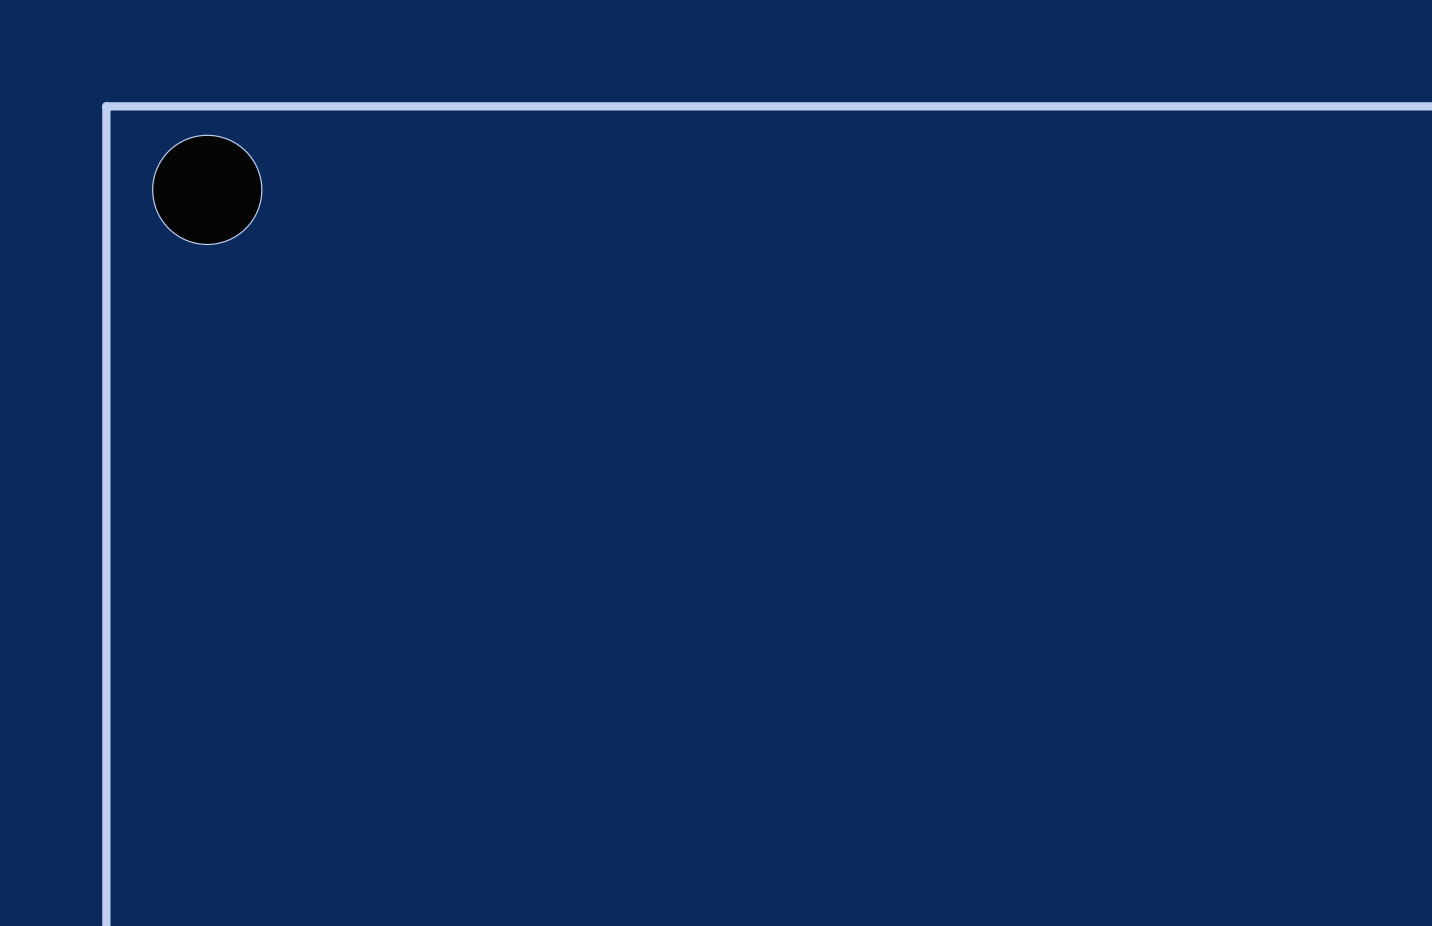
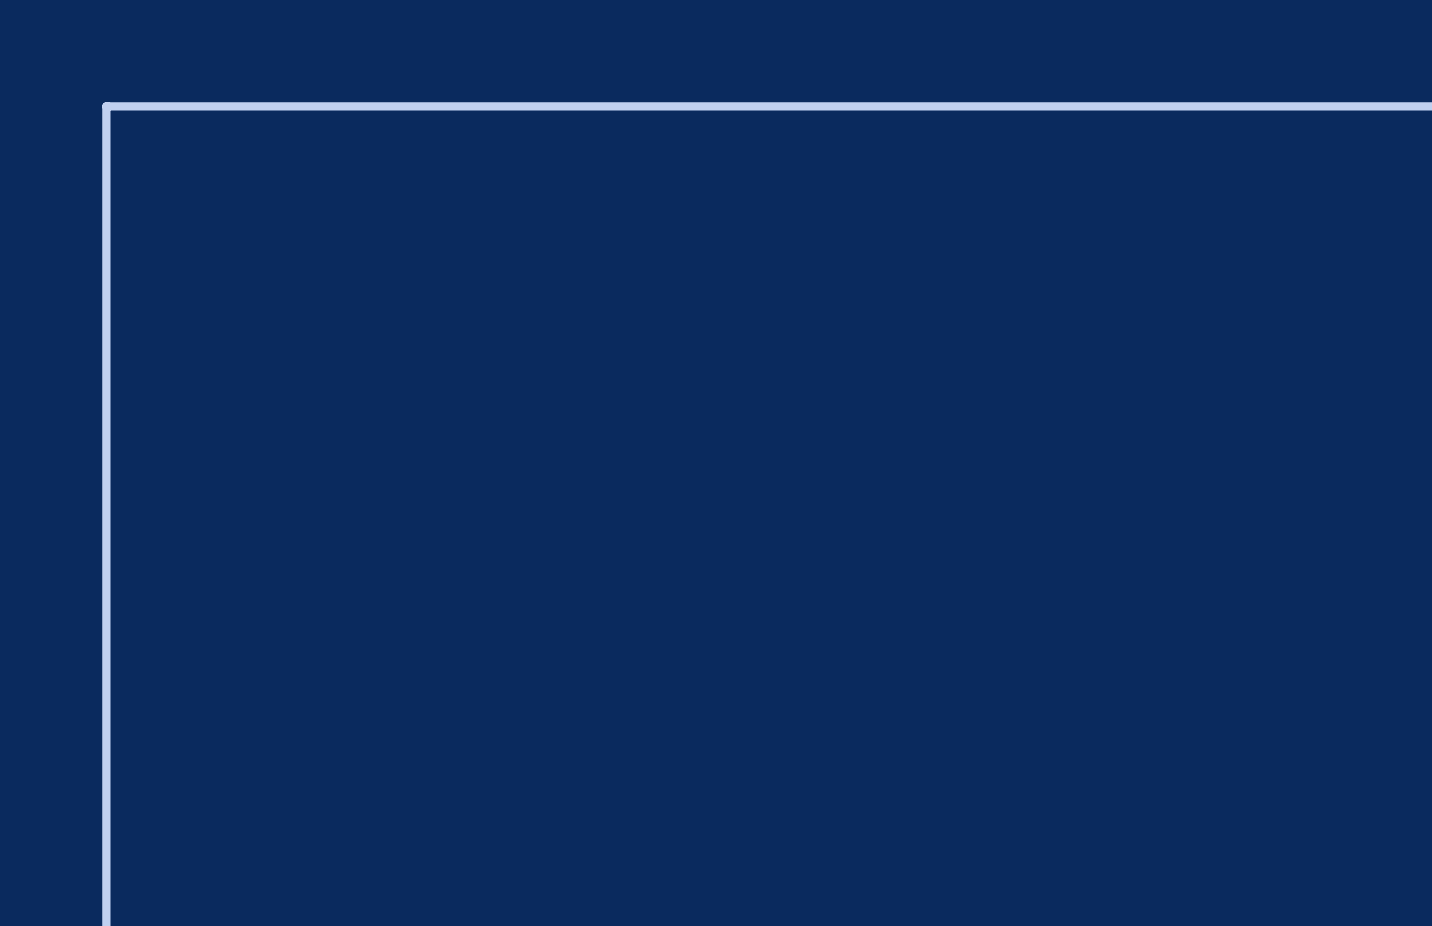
hole: (207, 189) -> none

